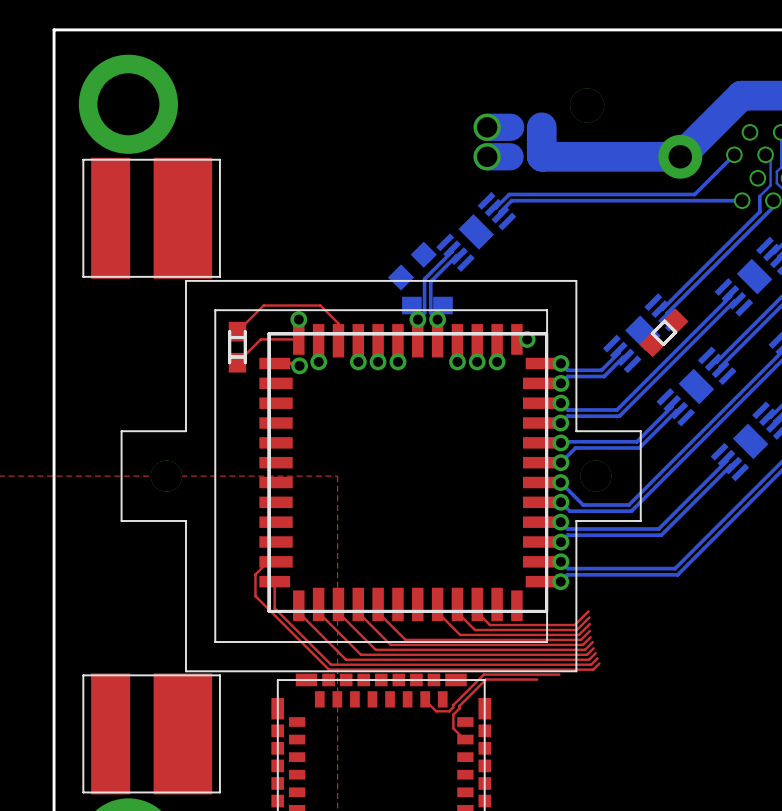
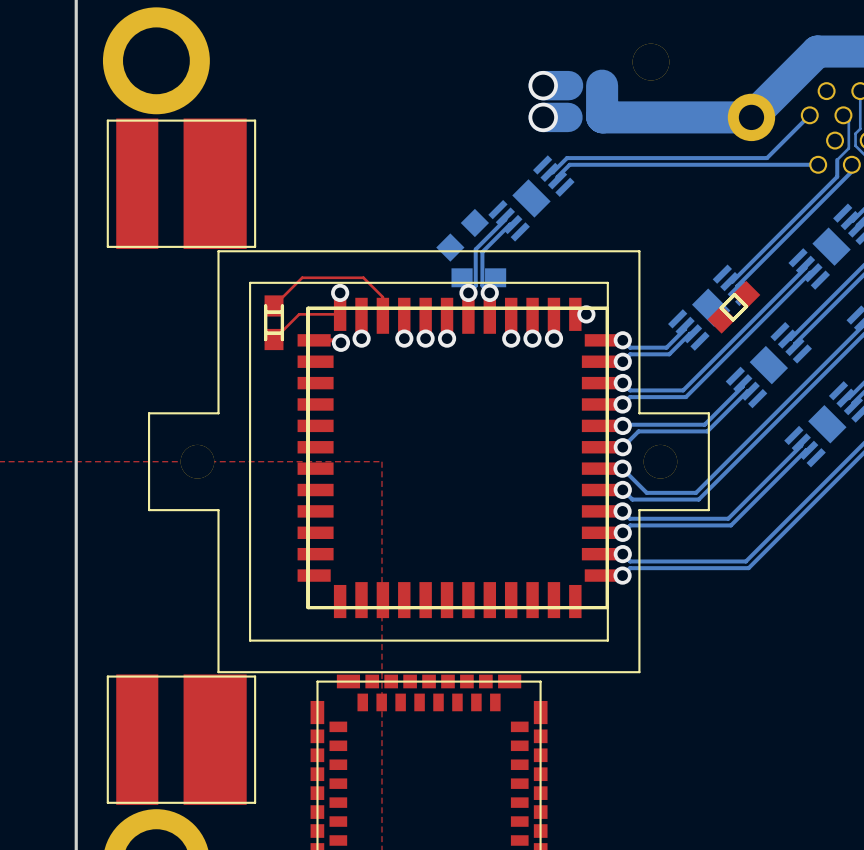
top track: (276, 561) (268, 561) (255, 574) (255, 596) (329, 669) (593, 669) (599, 663) -> none
top track: (274, 581) (274, 608) (331, 664) (591, 664) (597, 658) -> none
top track: (318, 604) (318, 612) (360, 654) (587, 654) (593, 648) -> none
top track: (338, 604) (338, 612) (375, 649) (585, 649) (592, 642) -> none
top track: (358, 604) (358, 612) (390, 644) (583, 644) (590, 637) -> none
top track: (378, 604) (378, 612) (405, 639) (580, 639) (589, 630) -> none
top track: (437, 604) (437, 612) (460, 634) (578, 634) (589, 624) -> none
top track: (457, 604) (457, 612) (474, 629) (576, 629) (589, 617) -> none
top track: (477, 604) (477, 612) (489, 625) (574, 625) (588, 611) -> none
top track: (298, 605) (298, 612) (346, 659) (589, 659) (595, 653) -> none
top track: (559, 674) (483, 674) (449, 711) (436, 711) (425, 699) -> none
top track: (537, 679) (485, 679) (453, 714) (453, 728) (465, 739) -> none

